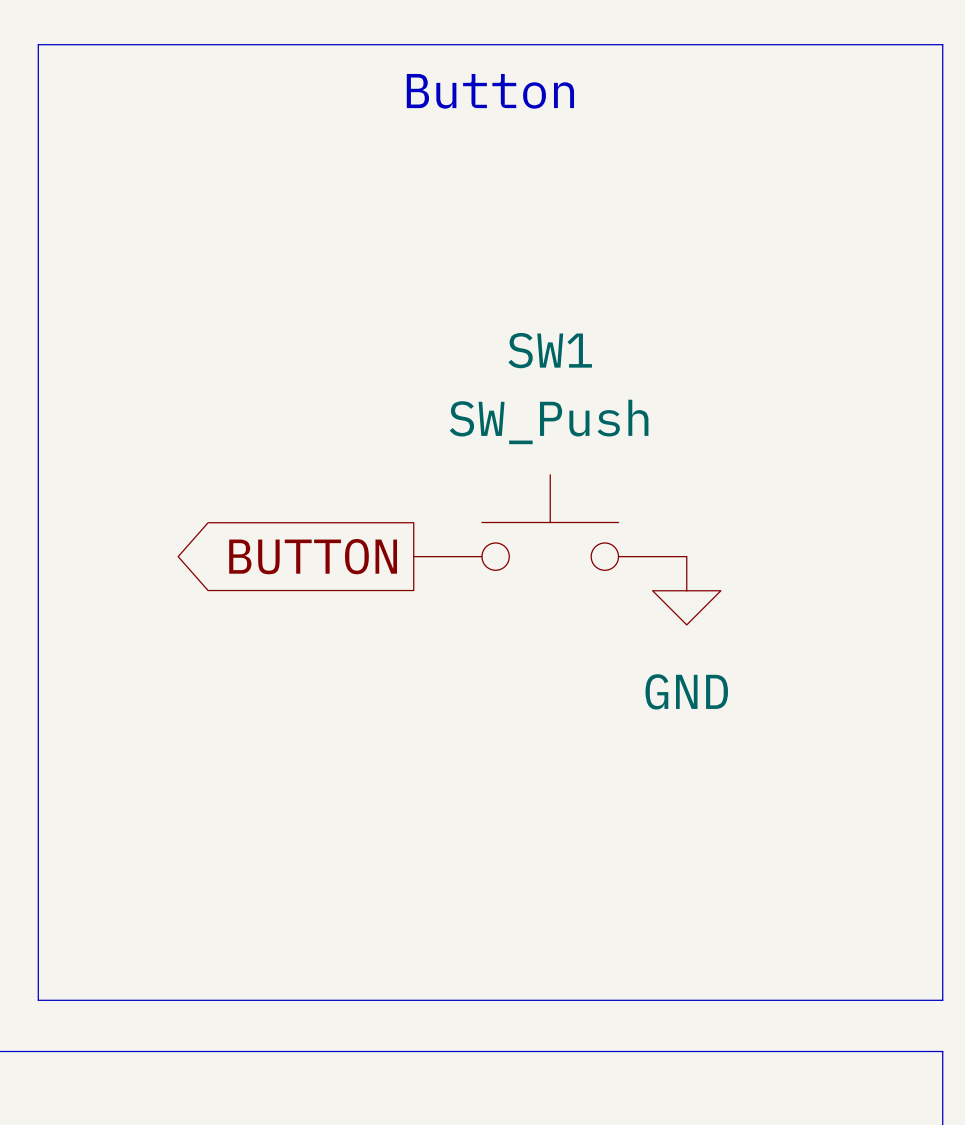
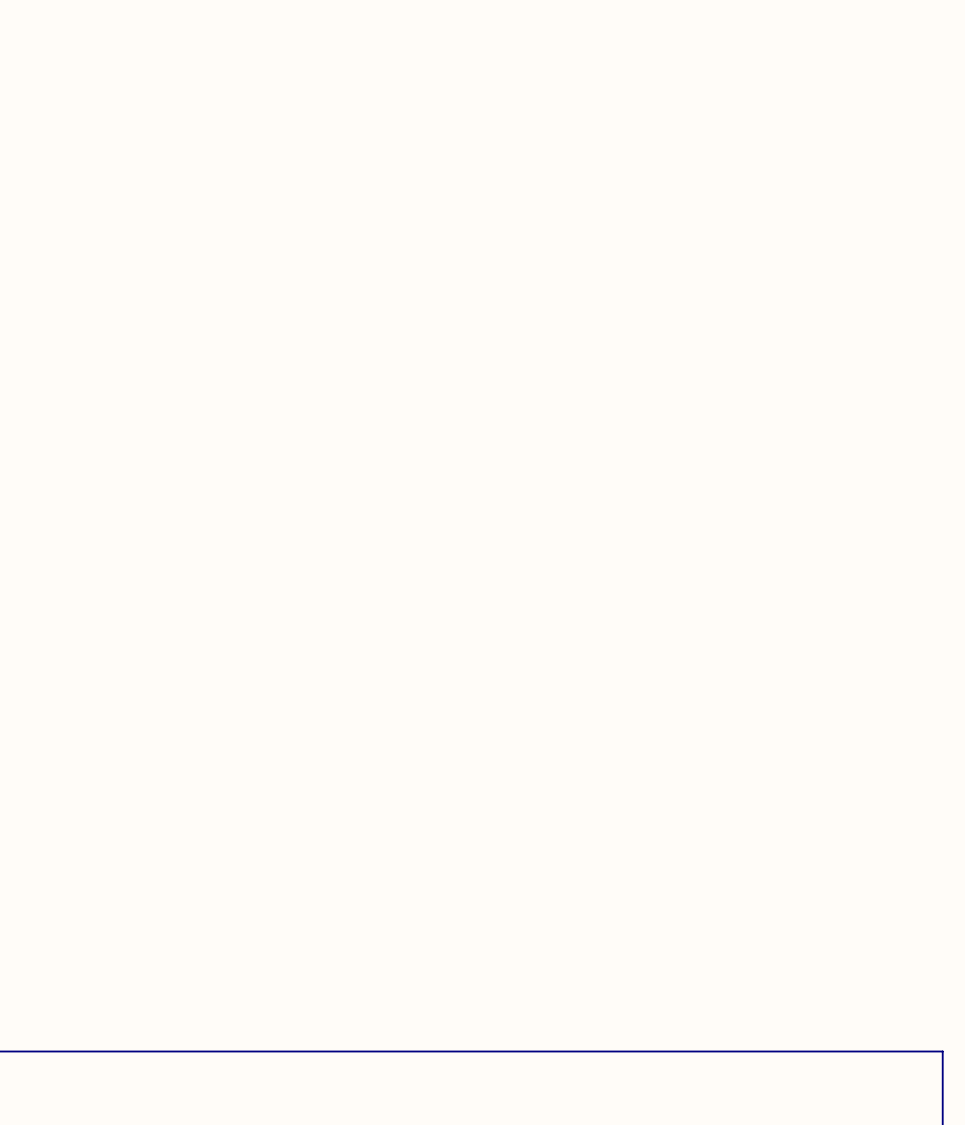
line: (38, 44) (942, 44) (942, 1000) (38, 1000) (38, 44) -> none
text: Button (490, 91) -> none
SW1: SW_Push (550, 522) -> none
global label: BUTTON (313, 556) -> none
power symbol: GND (686, 590) -> none

